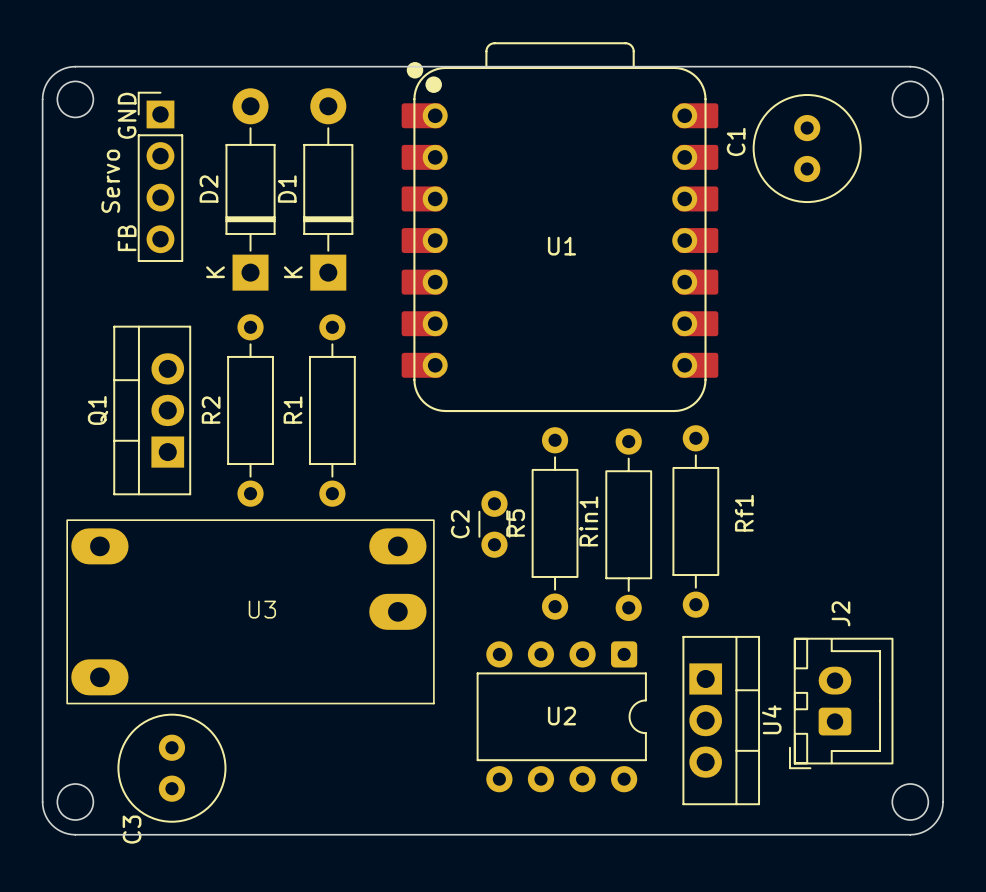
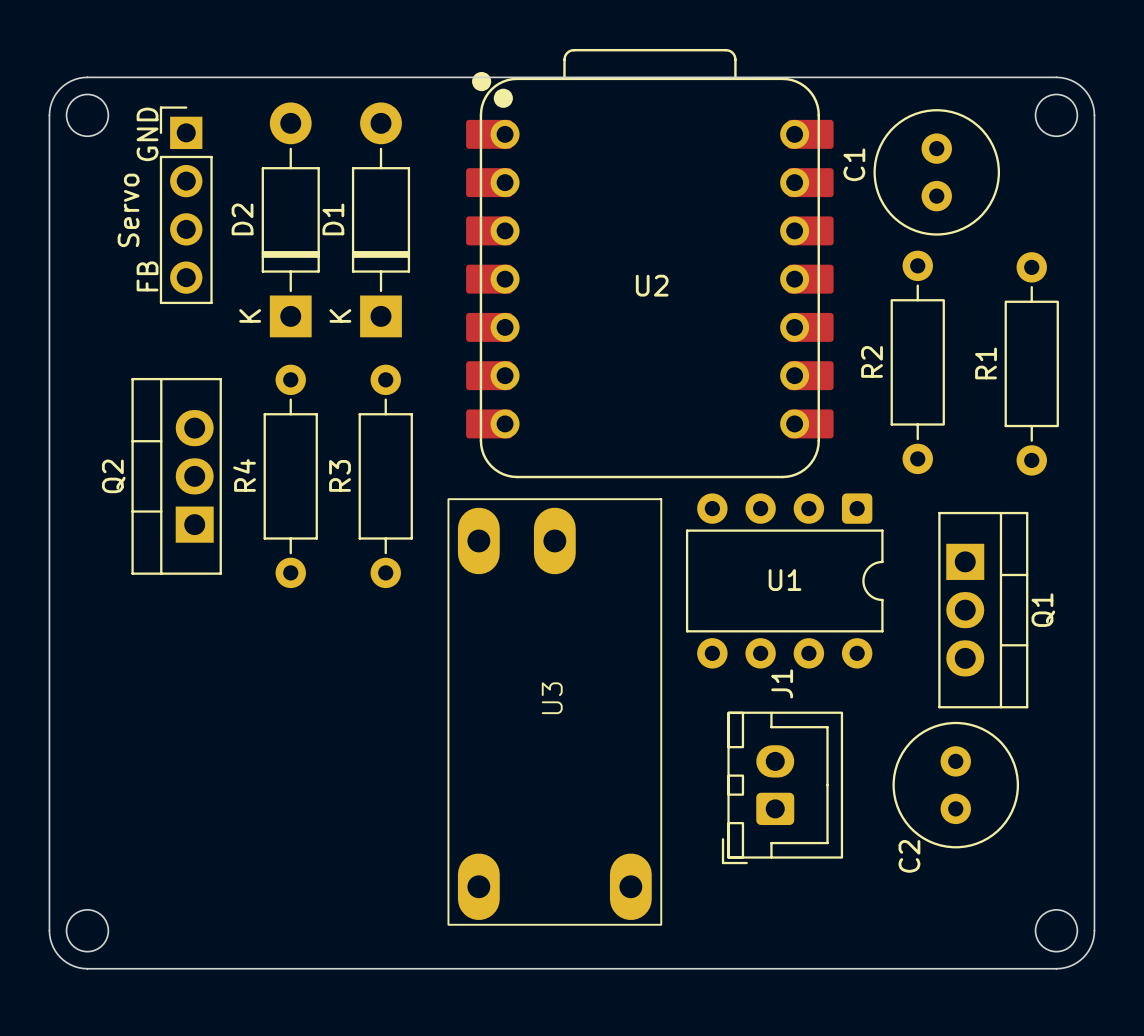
U1 name: U1 (561, 246) -> U2 (652, 285)
R2: none -> (917, 362)
R1: none -> (1031, 363)
Q1 name: Q1 (98, 410) -> Q2 (113, 476)
R2 name: R2 (211, 410) -> R4 (244, 475)
R1 name: R1 (292, 410) -> R3 (340, 475)
C2 footprint: [478, 490, 511, 558] -> [892, 721, 1020, 849]
U1: none -> (784, 580)
Rf1: (695, 521) -> none
R5: (555, 523) -> none
C2 name position: C2 (460, 524) -> C2 (909, 856)
Rin1: (628, 524) -> none
Q1: none -> (983, 610)
U3 rotation: 0° (250, 611) -> 90° counterclockwise (554, 711)
U3 position: (250, 611) -> (554, 711)
J1: none -> (782, 787)
J2: (841, 703) -> none
U2: (561, 716) -> none
U4: (721, 720) -> none
C3: (171, 768) -> none

